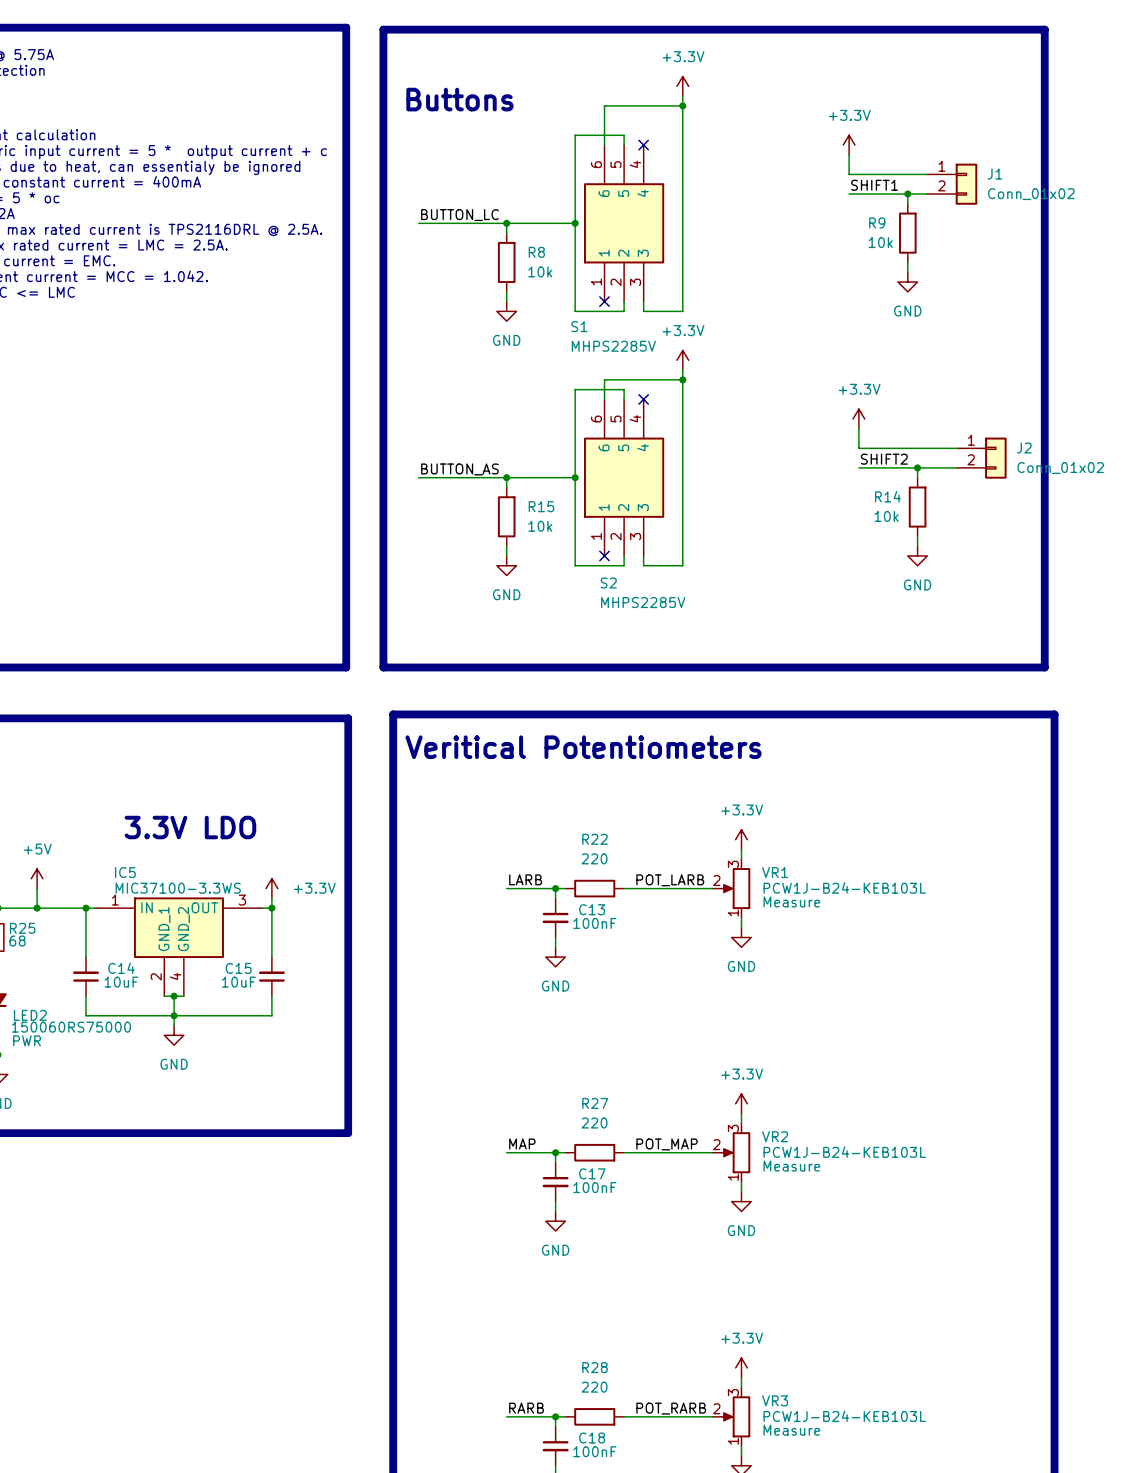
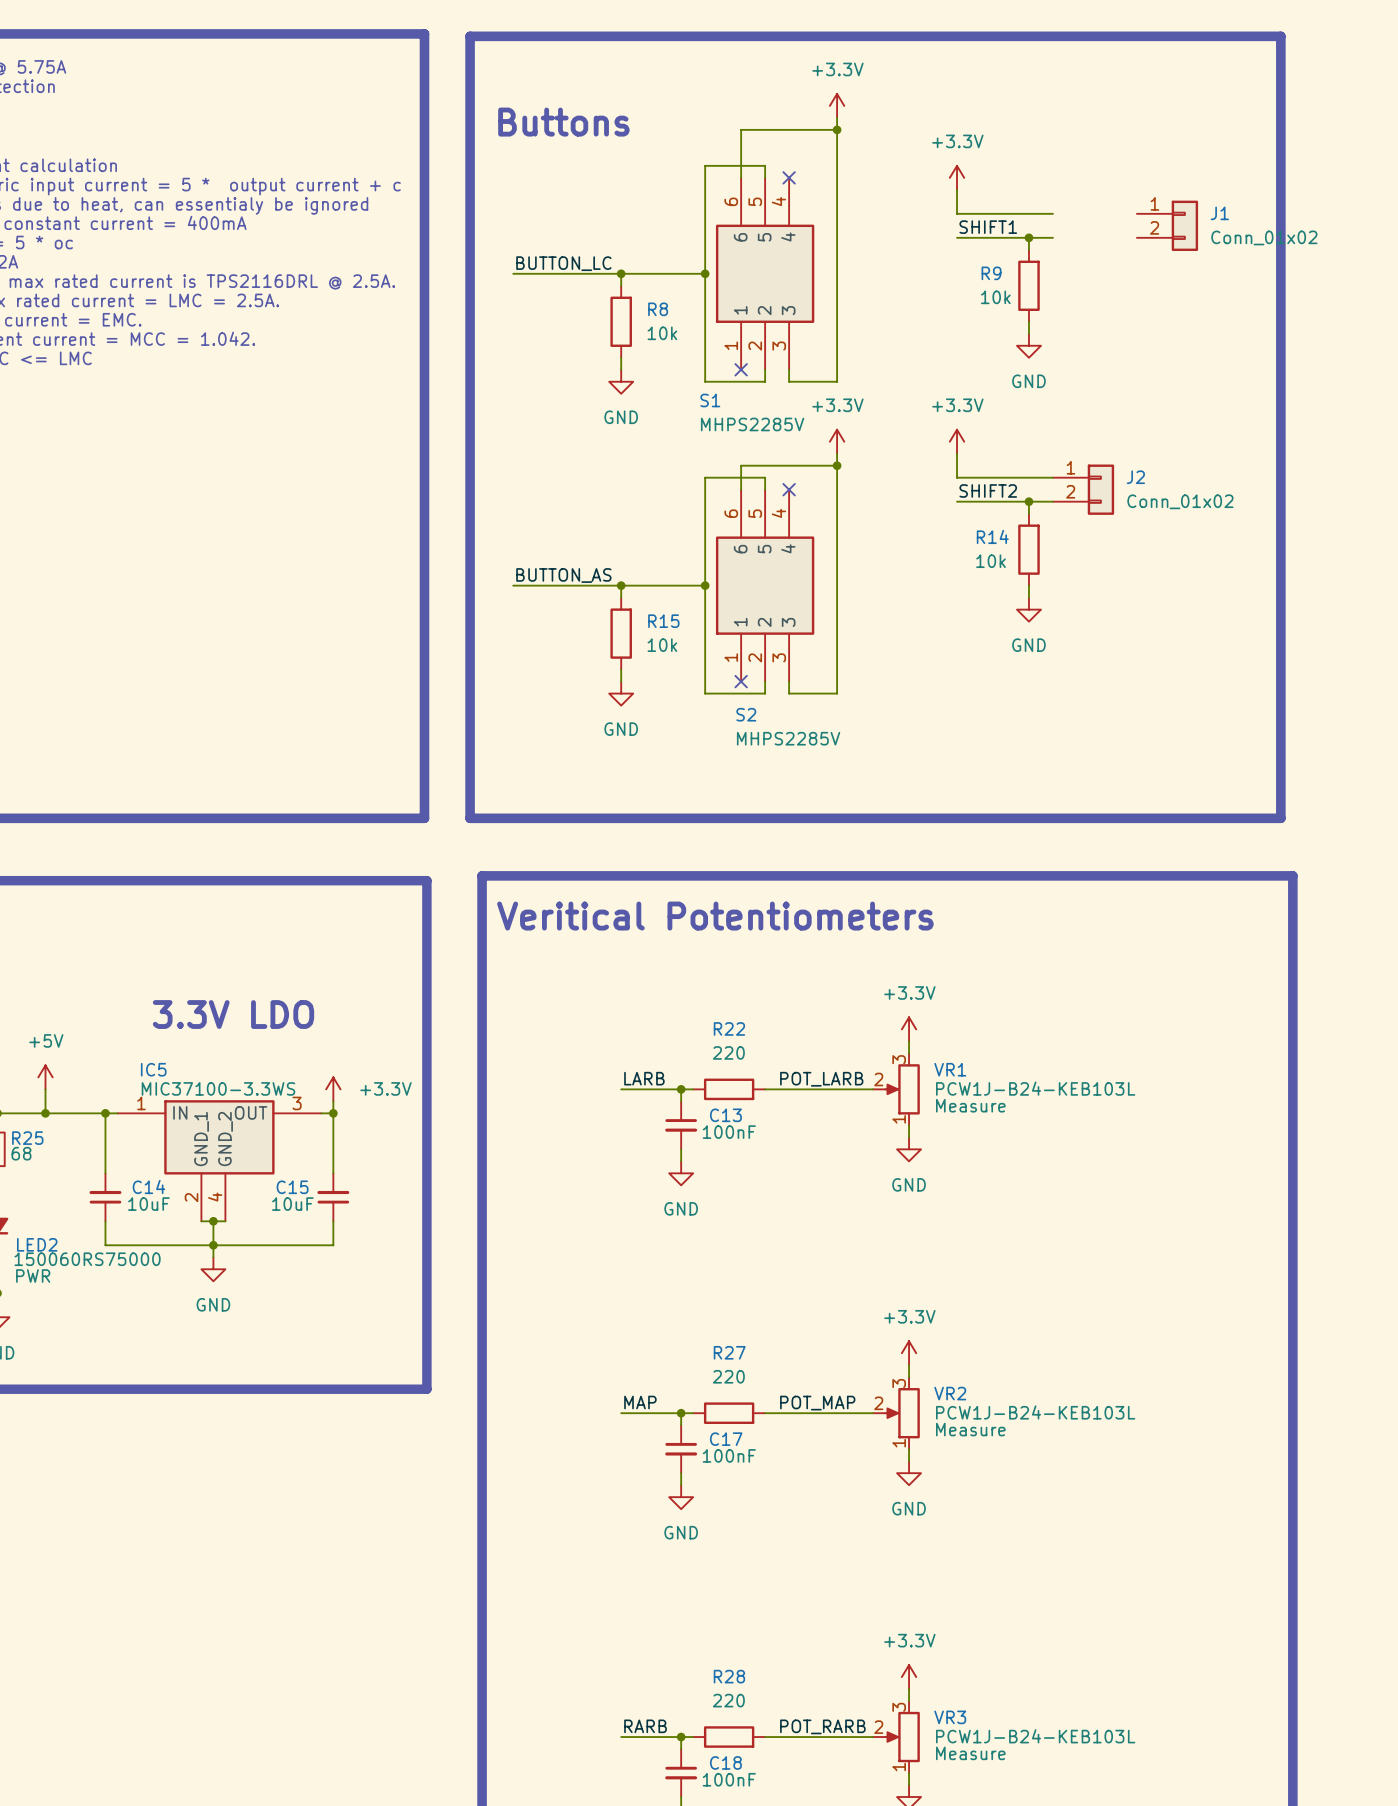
power symbol position: +3.3V (849, 145) -> +3.3V (957, 177)
wire: (849, 154) (849, 174) -> (957, 189) (957, 213) (1040, 213)
wire: (858, 174) (927, 174) -> none
label position: SHIFT1 (874, 185) -> SHIFT1 (988, 227)
junction: none -> (1028, 237)
wire: (858, 193) (927, 193) -> (957, 237) (1040, 237)
wire: (907, 193) (907, 203) -> (1028, 237) (1028, 249)
junction: (907, 193) -> none
R9 position: (907, 233) -> (1028, 285)
wire: (907, 262) (907, 272) -> (1028, 321) (1028, 333)
power symbol position: GND (907, 282) -> GND (1028, 345)
wire: none -> (957, 453) (957, 477) (1052, 477)
wire: none -> (957, 501) (1052, 501)
junction: none -> (1028, 501)
power symbol position: +3.3V (858, 419) -> +3.3V (957, 441)
wire: (858, 428) (858, 448) (956, 448) -> none
J2 position: (981, 458) -> (1083, 489)
label position: SHIFT2 (884, 459) -> SHIFT2 (988, 490)
wire: (858, 467) (956, 467) -> none
wire: (917, 467) (917, 477) -> (1028, 501) (1028, 513)
junction: (917, 467) -> none
R14 position: (917, 507) -> (1028, 549)
wire: (917, 536) (917, 546) -> (1028, 585) (1028, 597)
power symbol position: GND (917, 555) -> GND (1028, 609)

